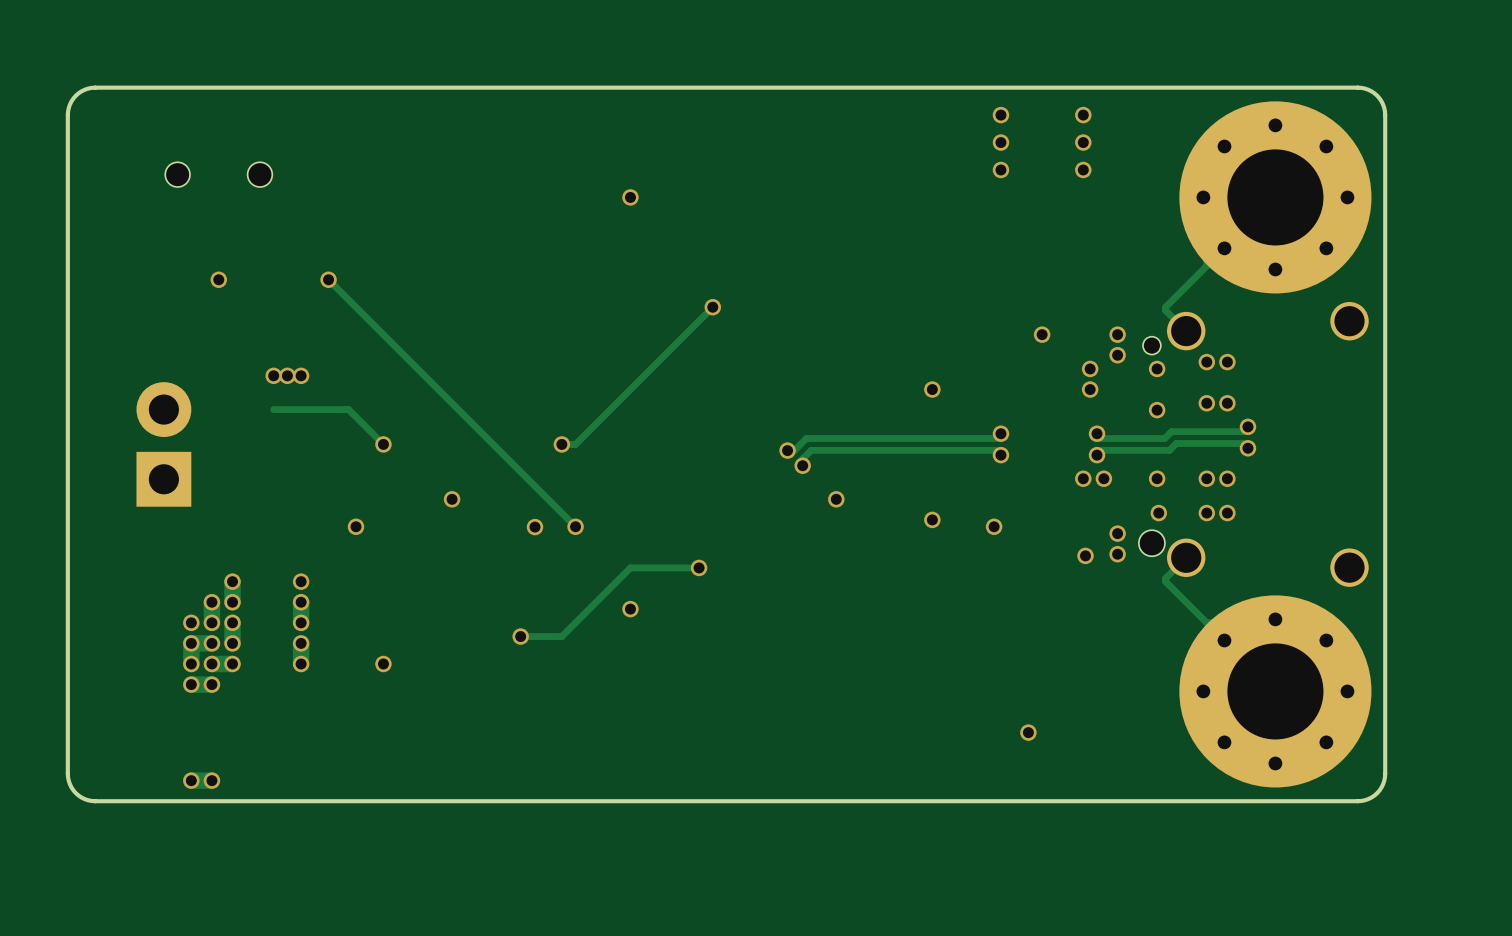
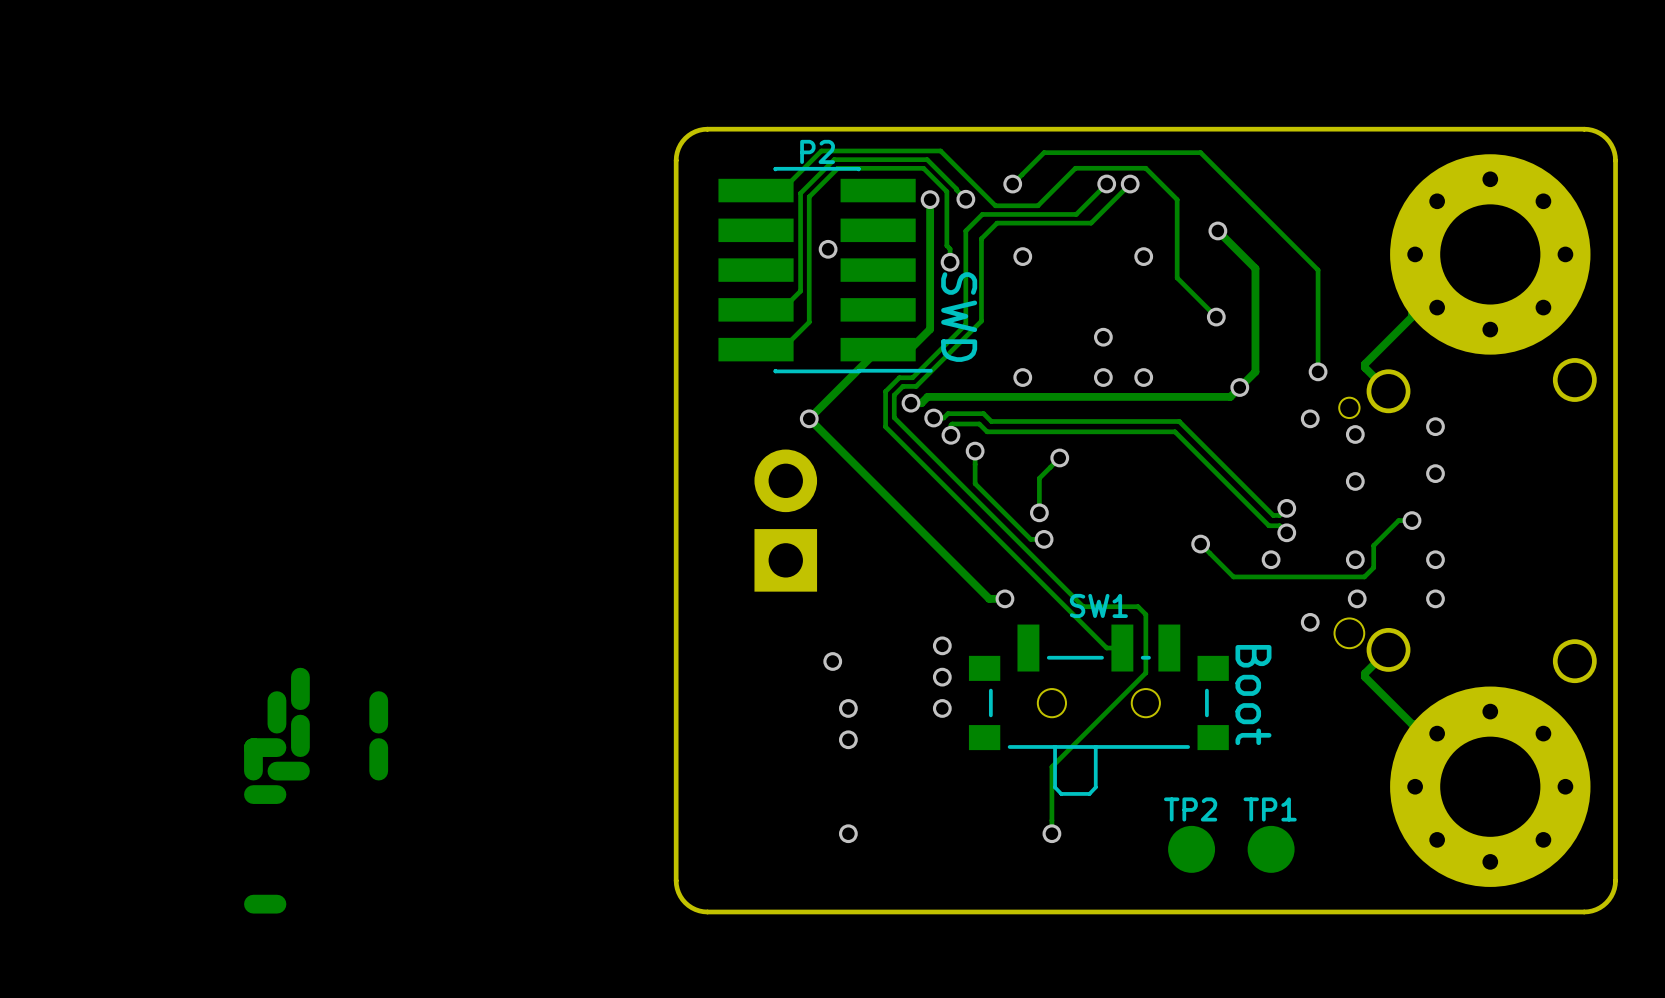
part footprint: [1179, 101, 1372, 294] -> [1390, 154, 1591, 355]
via: (1000, 115) -> none
via: (1083, 115) -> none
board edge: (1385, 128) (1384, 111) (1381, 101) (1371, 91) (1357, 87) (95, 87) (84, 89) (75, 95) (69, 104) (67, 115) (67, 773) (73, 790) (84, 799) (95, 801) (1357, 801) (1371, 797) (1381, 787) (1384, 777) (1385, 760) -> (1615, 160) (1613, 148) (1606, 138) (1596, 131) (1584, 129) (707, 129) (695, 131) (685, 138) (678, 148) (676, 160) (676, 880) (678, 892) (688, 905) (695, 909) (707, 911) (1584, 911) (1596, 909) (1606, 902) (1613, 892) (1615, 880)
via: (1000, 142) -> none
via: (1083, 142) -> none
track: none -> (1012, 184) (1044, 152) (1200, 152) (1318, 270) (1318, 371)
via: none -> (1012, 184)
track: none -> (1106, 183) (1076, 214) (982, 214) (965, 230) (965, 324) (912, 377) (899, 377) (885, 391) (885, 426) (1106, 648) (1122, 648)
via: none -> (1106, 183)
track: none -> (1130, 184) (1091, 223) (997, 223) (981, 238) (981, 321) (916, 386) (902, 386) (894, 395) (894, 417) (1083, 606) (1138, 606) (1145, 614) (1145, 672) (1051, 766) (1051, 833)
via: none -> (1130, 184)
track: none -> (756, 190) (781, 190) (821, 150) (940, 150) (995, 205) (1037, 205) (1075, 168) (1145, 168) (1177, 199) (1177, 277) (1216, 317)
track: none -> (965, 199) (927, 159) (834, 159) (800, 193) (800, 291) (781, 309) (756, 309)
via: none -> (965, 199)
track: none -> (930, 199) (930, 329) (909, 349) (878, 349)
via: none -> (930, 199)
via: (1000, 169) -> none
via: (1083, 169) -> none
part: (218, 174) -> none
track: none -> (1217, 230) (1255, 268) (1255, 371) (1230, 396) (927, 396) (921, 403) (911, 403)
via: none -> (1217, 230)
via: (630, 197) -> none
via: none -> (828, 249)
via: none -> (1022, 256)
via: none -> (1143, 256)
track: none -> (950, 262) (950, 248) (946, 245) (946, 191) (923, 168) (837, 168) (809, 196) (809, 322) (781, 349) (756, 349)
via: none -> (950, 262)
P2: none -> SWD (825, 270)
via: none -> (1216, 317)
via: (218, 279) -> none
track: (328, 279) (575, 526) -> none
via: (328, 279) -> none
via: none -> (1103, 337)
track: none -> (878, 349) (809, 418) (989, 598) (1004, 598)
track: (712, 307) (575, 444) (561, 444) -> none
via: (712, 307) -> none
via: none -> (1022, 377)
via: none -> (1103, 377)
via: none -> (1143, 377)
via position: (1042, 334) -> (1239, 387)
via position: (1117, 334) -> (1318, 371)
via: none -> (911, 403)
via: none -> (933, 418)
via: none -> (809, 418)
via: (1206, 362) -> none
via: (1090, 368) -> none
via: none -> (950, 435)
via: (273, 375) -> none
via: (287, 375) -> none
via: (301, 375) -> none
track: none -> (975, 451) (975, 483) (1030, 539) (1044, 539)
via: none -> (975, 451)
track: none -> (1059, 457) (1039, 478) (1039, 512)
via position: (932, 389) -> (1059, 457)
via: (1090, 389) -> none
via: (1206, 403) -> none
track: (273, 409) (348, 409) (383, 444) -> none
track: (1247, 426) (1243, 431) (1171, 431) (1164, 438) (1101, 438) (1097, 433) -> (933, 418) (943, 418) (948, 413) (983, 413) (991, 421) (1179, 421) (1273, 515) (1279, 515) (1286, 508)
via: (1247, 426) -> none
track: (1000, 433) (996, 438) (806, 438) (794, 450) (787, 450) -> none
via: (1000, 433) -> none
via: none -> (1039, 512)
part position: (163, 444) -> (785, 520)
via: (383, 444) -> none
via: (561, 444) -> none
track: none -> (1412, 520) (1398, 520) (1373, 545) (1373, 567) (1364, 576) (1233, 576) (1200, 544)
via: none -> (1412, 520)
track: (1247, 448) (1243, 443) (1176, 443) (1169, 450) (1101, 450) (1097, 455) -> (950, 435) (952, 423) (979, 423) (987, 431) (1175, 431) (1268, 525) (1279, 525) (1286, 532)
via: (1247, 448) -> none
via: (787, 450) -> none
track: (1000, 455) (996, 450) (811, 450) (802, 458) (802, 465) -> none
via: (1000, 455) -> none
via: none -> (1044, 539)
via: (802, 465) -> none
via: none -> (1200, 544)
via: (1103, 478) -> none
via: (1206, 478) -> none
via: (452, 499) -> none
via position: (836, 499) -> (1004, 598)
via: (1206, 513) -> none
via: (932, 519) -> none
via: (356, 526) -> none
via: (575, 526) -> none
via: (994, 526) -> none
via: (534, 527) -> none
via: none -> (942, 645)
via: (1117, 554) -> none
via: (1085, 555) -> none
track: (699, 567) (630, 567) (561, 636) (520, 636) -> none
via: (232, 581) -> none
via: (301, 581) -> none
via: none -> (942, 677)
part footprint: [1179, 595, 1372, 788] -> [1390, 686, 1591, 887]
via: (211, 602) -> none
via: (232, 602) -> none
via: (301, 602) -> none
via: (630, 609) -> none
via: none -> (848, 708)
via: none -> (942, 708)
SW1: none -> Boot (1098, 710)
via: (191, 622) -> none
via: (211, 622) -> none
via: (232, 622) -> none
via: (301, 622) -> none
via: (520, 636) -> none
via: none -> (848, 739)
via: (191, 643) -> none
via: (211, 643) -> none
via: (232, 643) -> none
via: (301, 643) -> none
via: (191, 663) -> none
via: (211, 663) -> none
via: (232, 663) -> none
via: (301, 663) -> none
via: (383, 663) -> none
via: (191, 684) -> none
via: (211, 684) -> none
via: none -> (848, 833)
via: none -> (1051, 833)
TP2: none -> (1191, 849)
via: (1028, 732) -> none
TP1: none -> (1271, 849)
via: (191, 780) -> none
via: (211, 780) -> none

